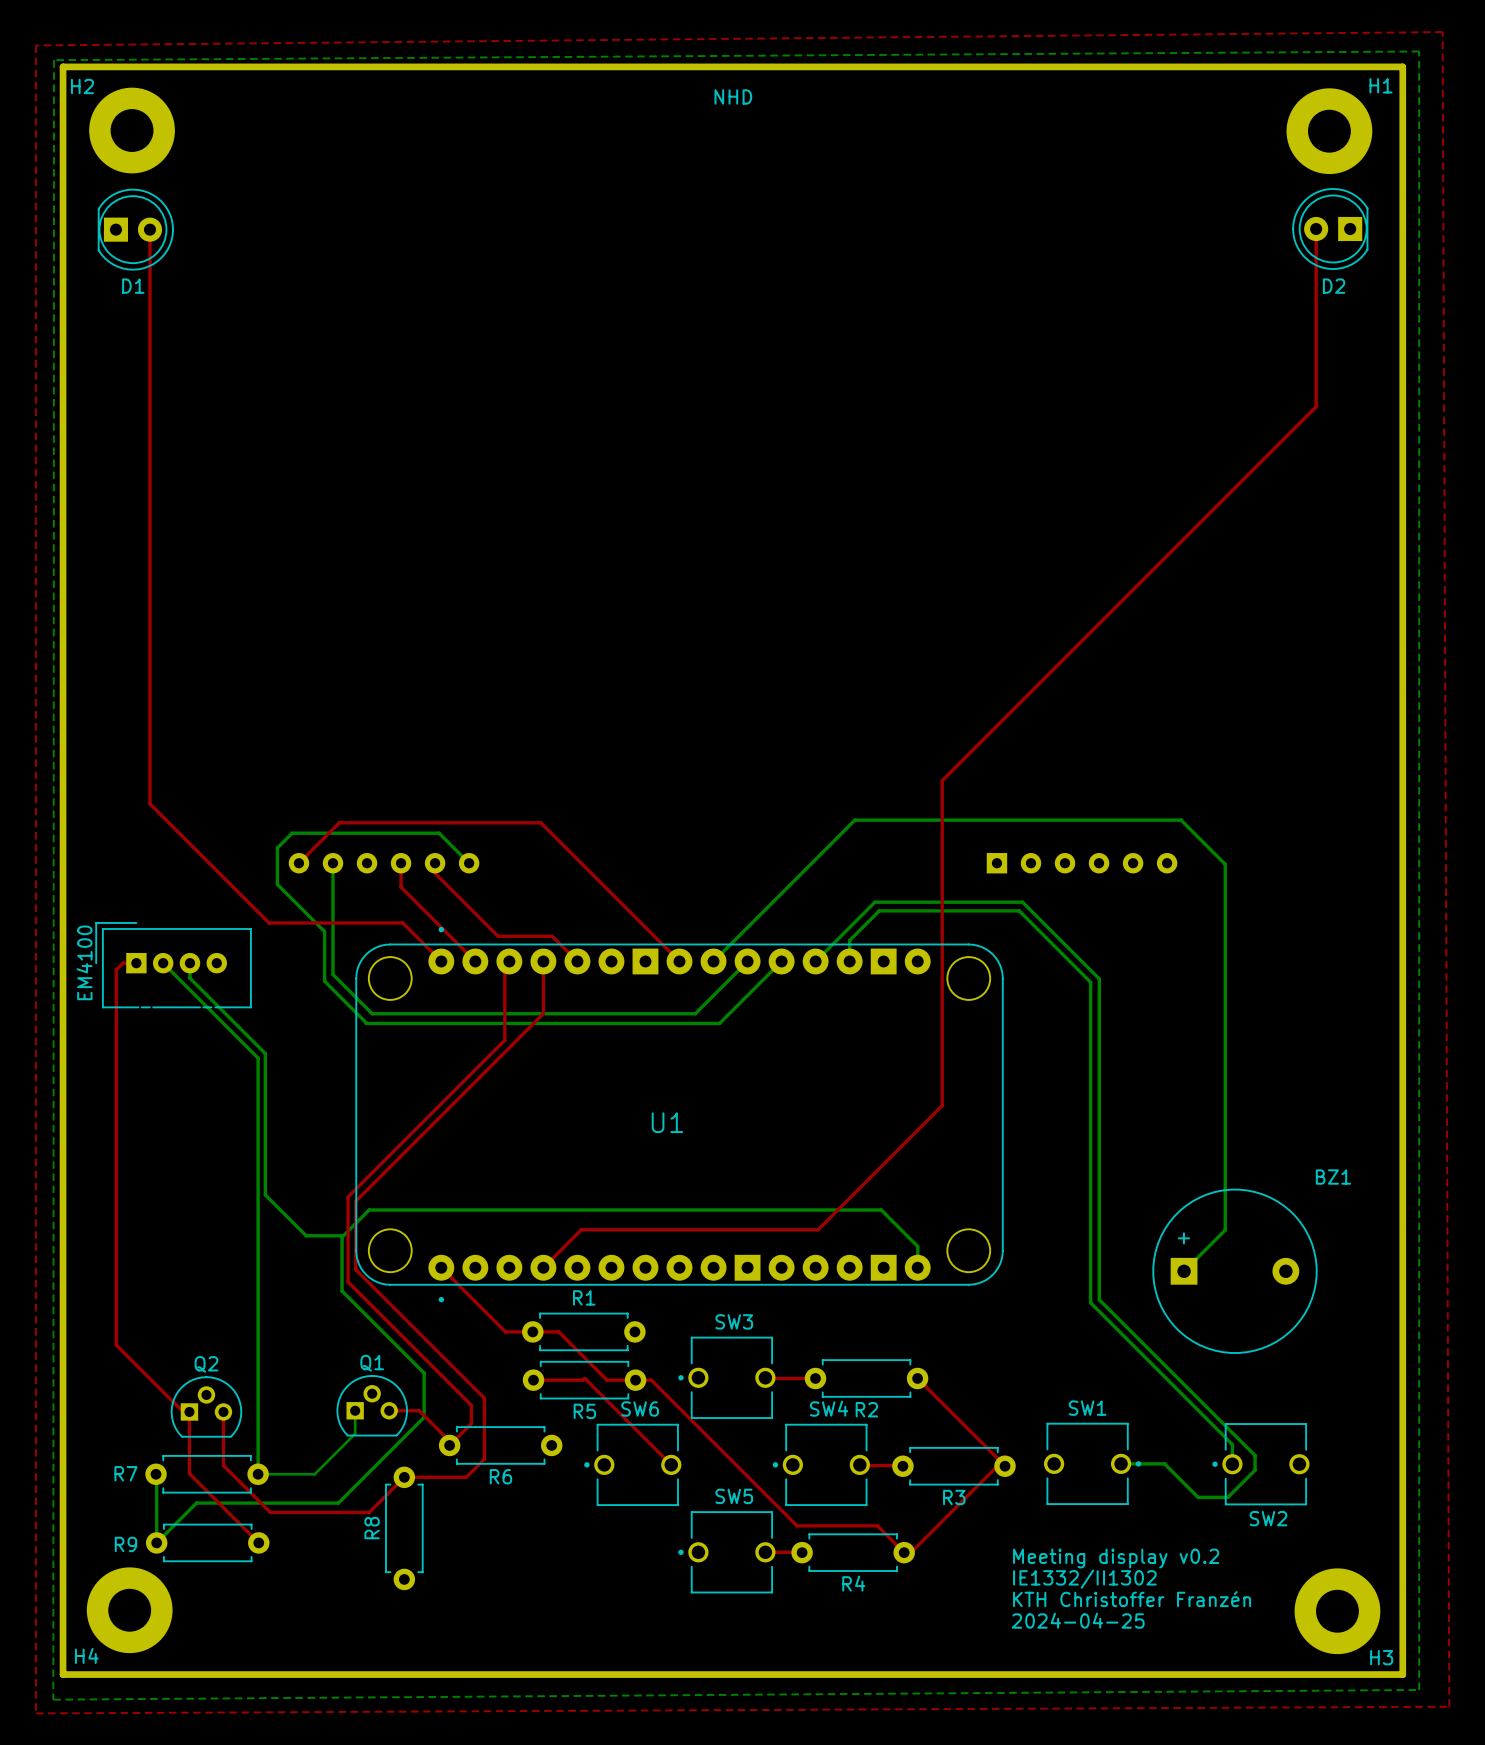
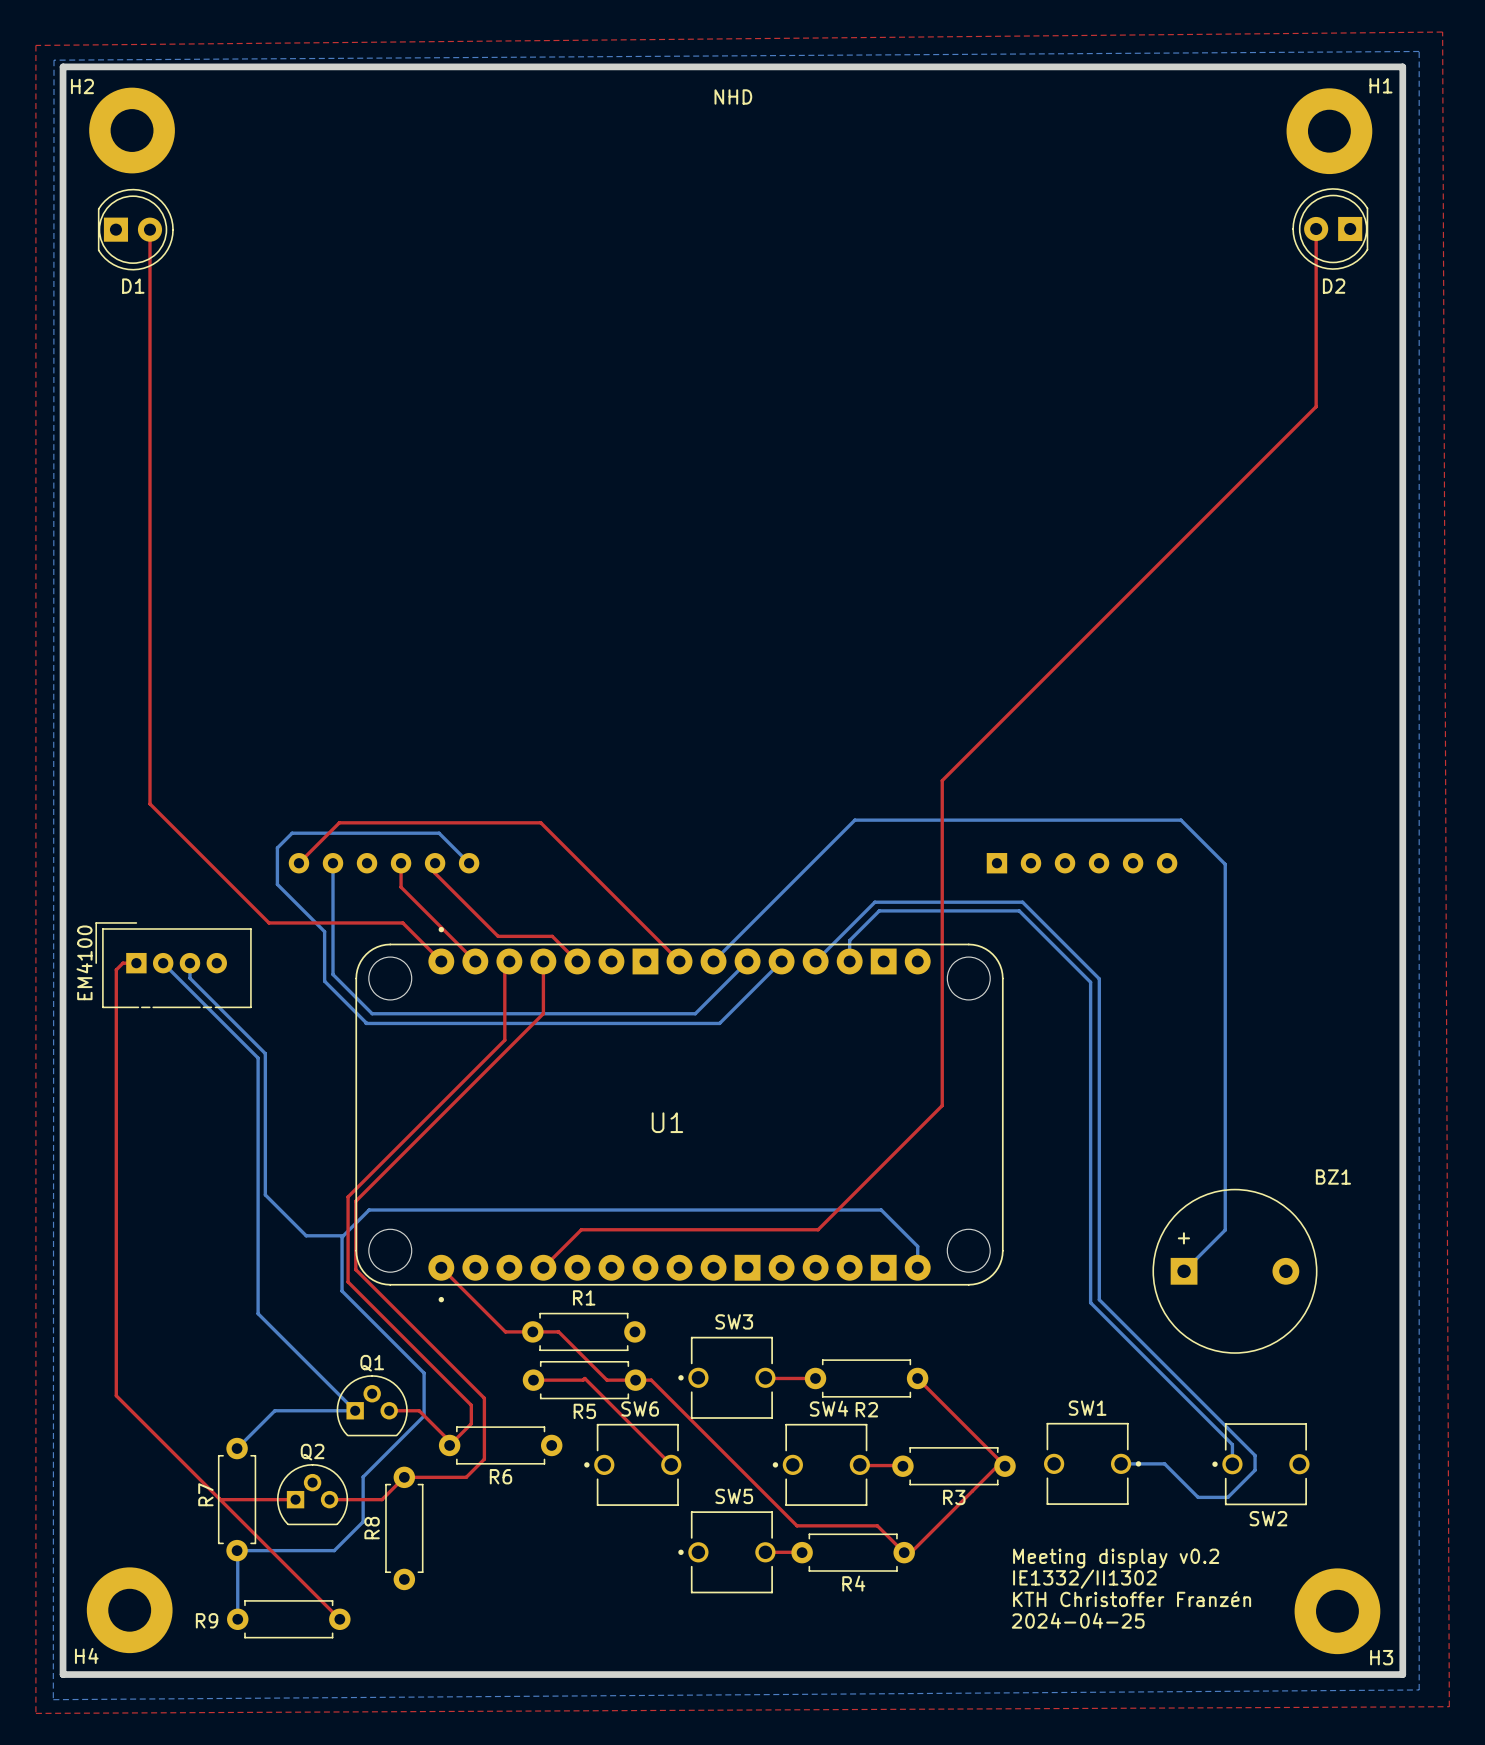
bottom track: (258, 1313) (258, 1474) (314, 1474) (355, 1433) (355, 1410) -> (258, 1313) (355, 1410) (274, 1410) (237, 1448)
top track: (116, 1344) (183, 1411) (189, 1411) -> (116, 1344) (116, 1395) (339, 1619)
Q2 position: (206, 1406) -> (312, 1494)
top track: (189, 1411) (189, 1473) (258, 1542) -> none
top track: (223, 1411) (223, 1465) (270, 1512) (369, 1512) (382, 1499) -> (329, 1499) (382, 1499)
bottom track: (424, 1415) (338, 1503) (196, 1503) (156, 1542) (156, 1474) -> (424, 1415) (363, 1476) (363, 1521) (334, 1550) (237, 1550) (237, 1619)
R7 name position: R7 (125, 1473) -> R7 (205, 1494)
R7 rotation: 0° (207, 1474) -> 90° clockwise (237, 1499)
top track: none -> (220, 1499) (295, 1499)
R9 position: (207, 1542) -> (288, 1619)

